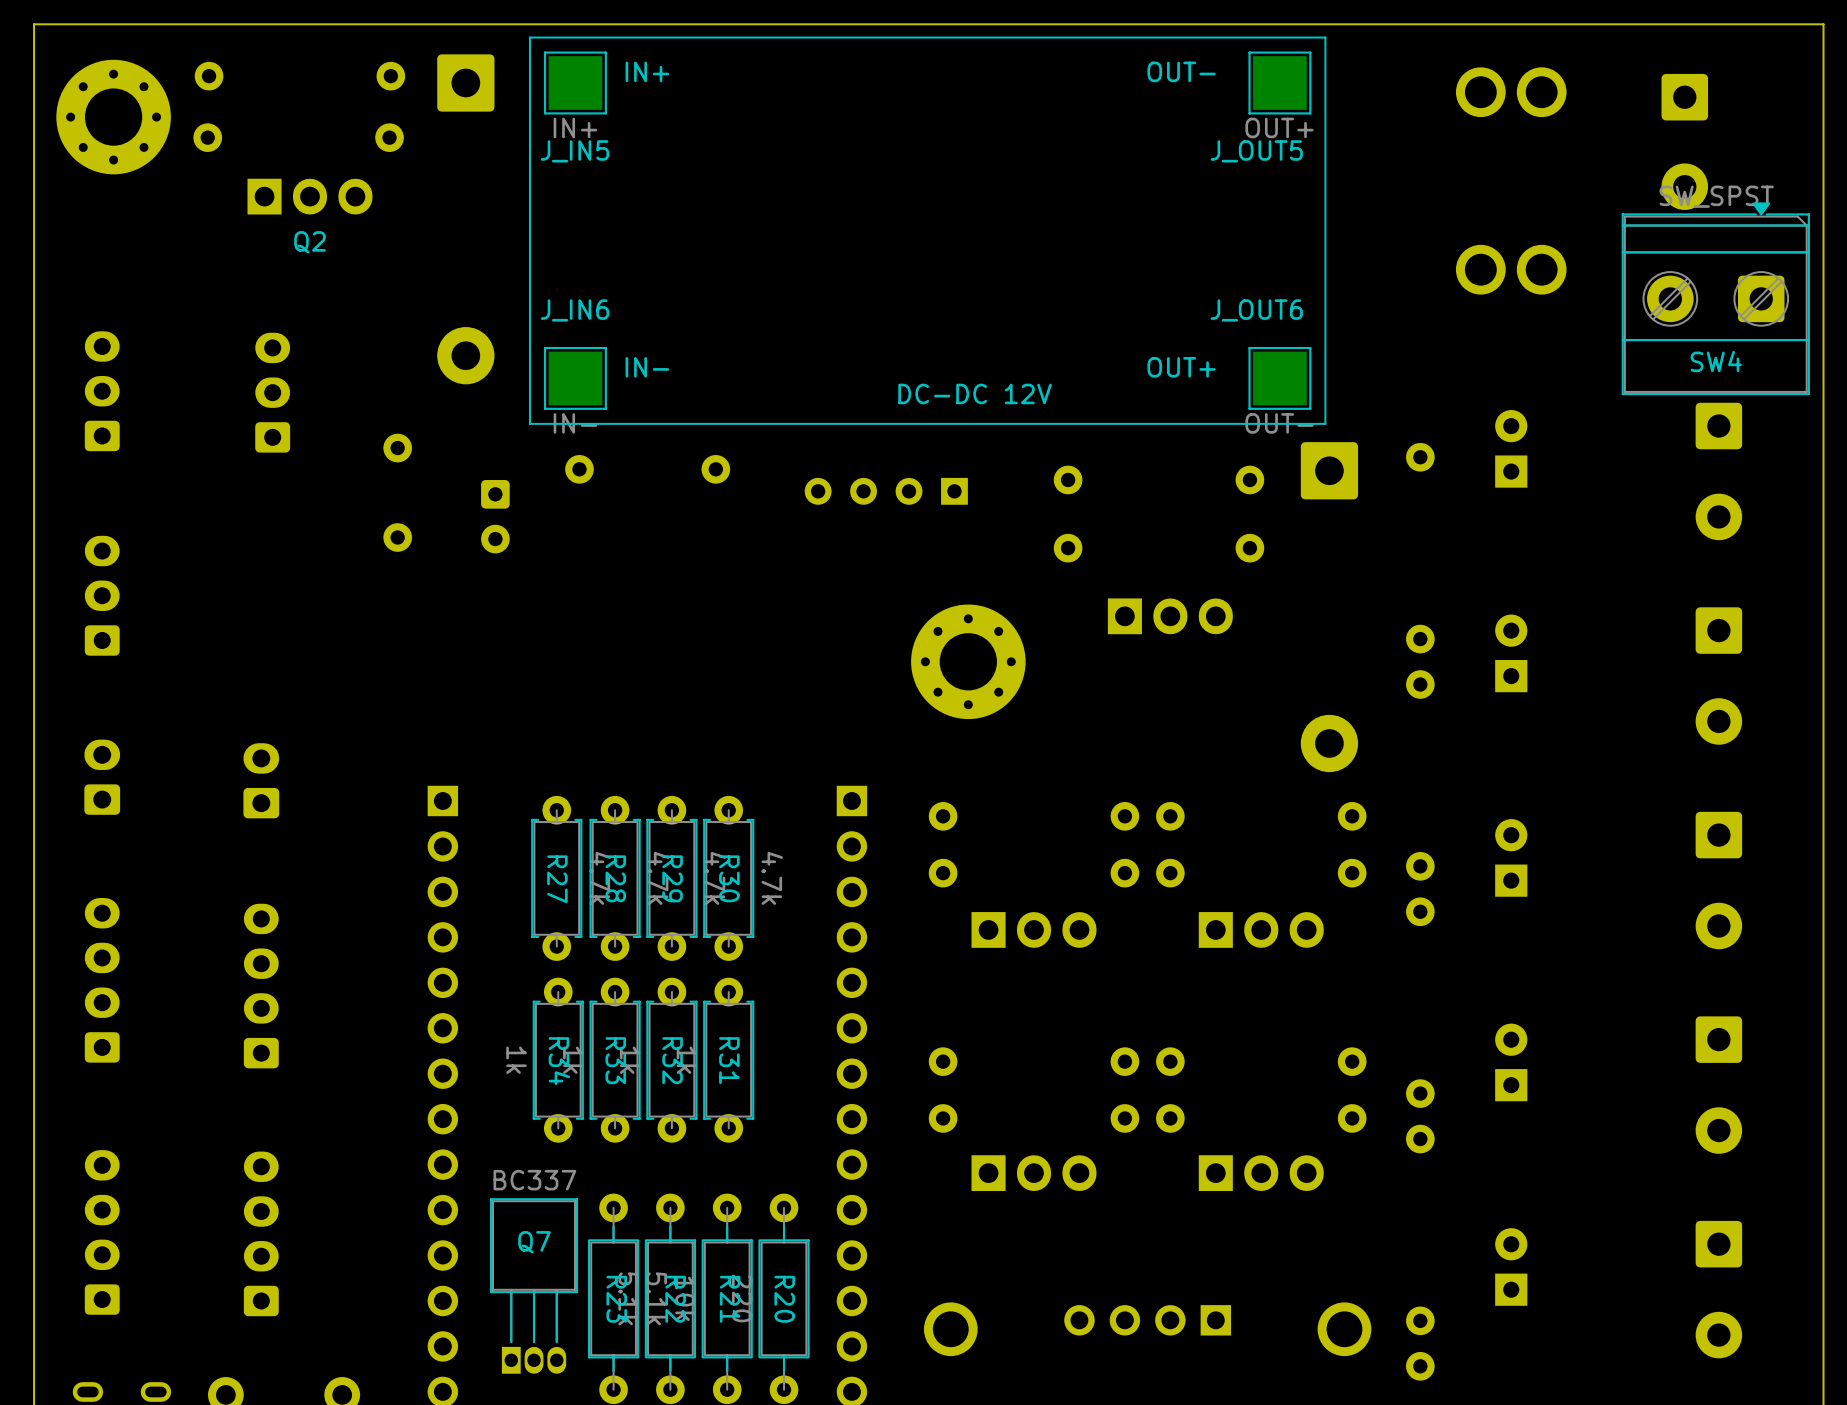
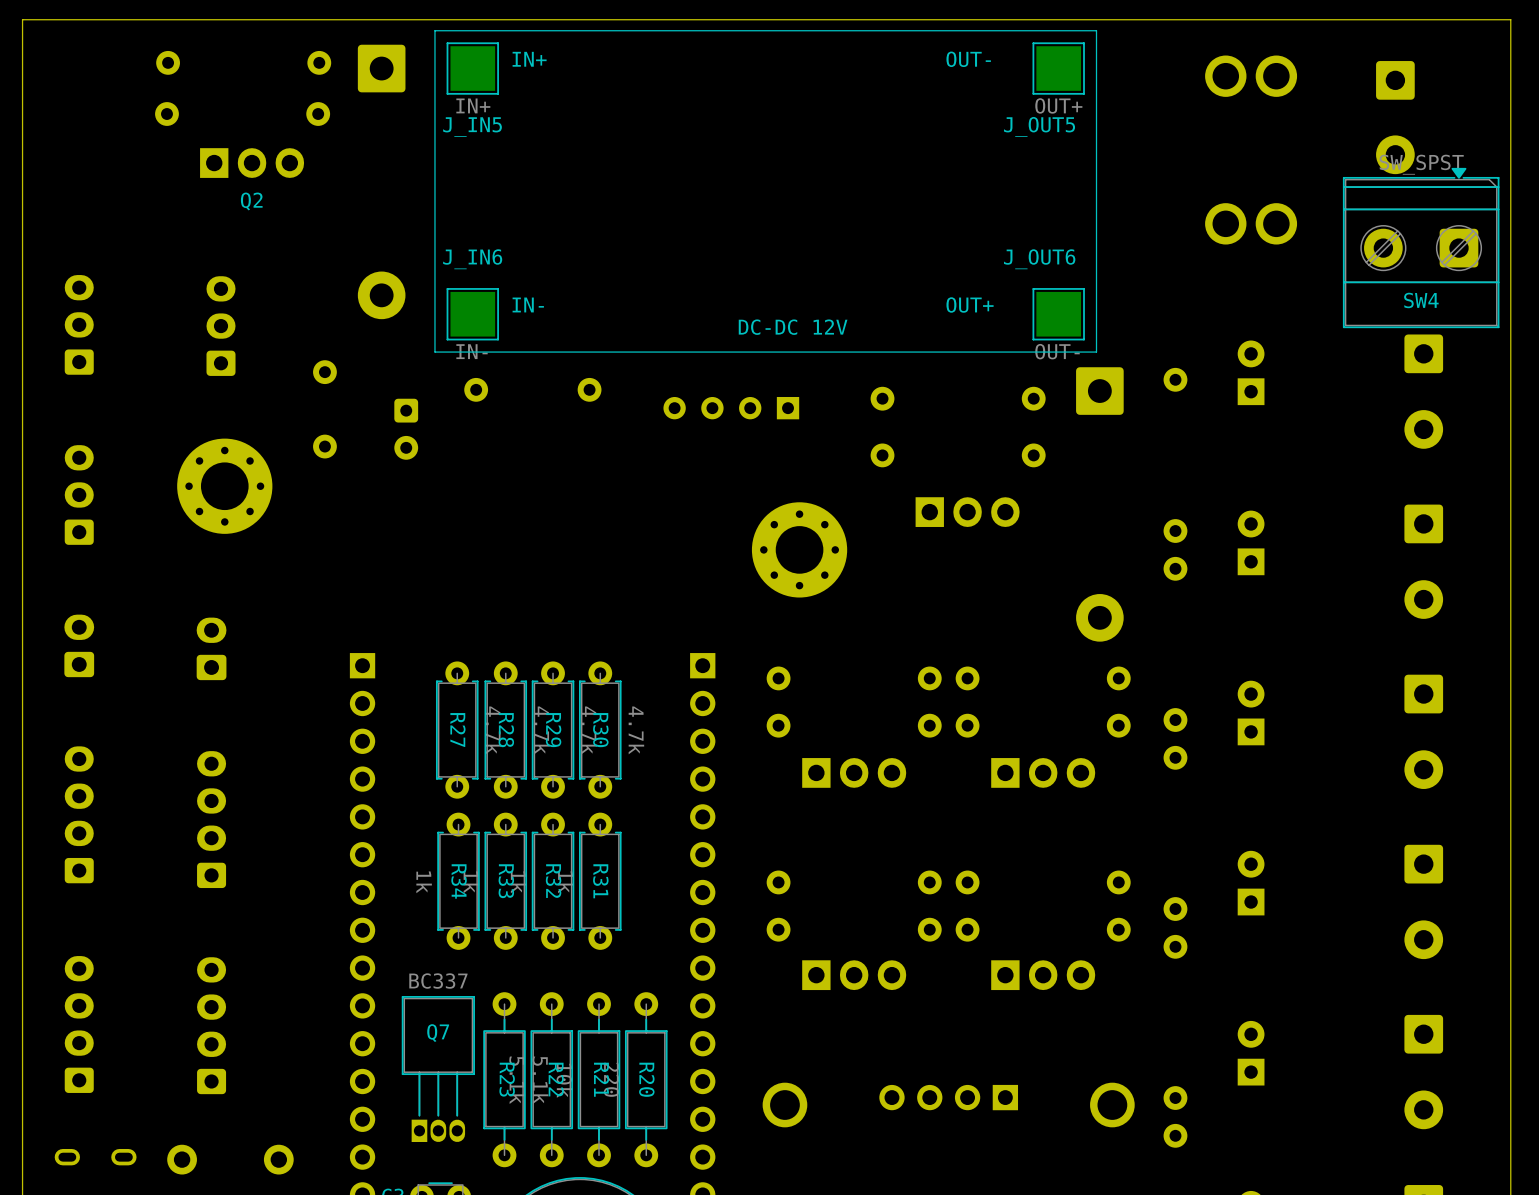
part: (113, 117) -> none
part: none -> (224, 486)

